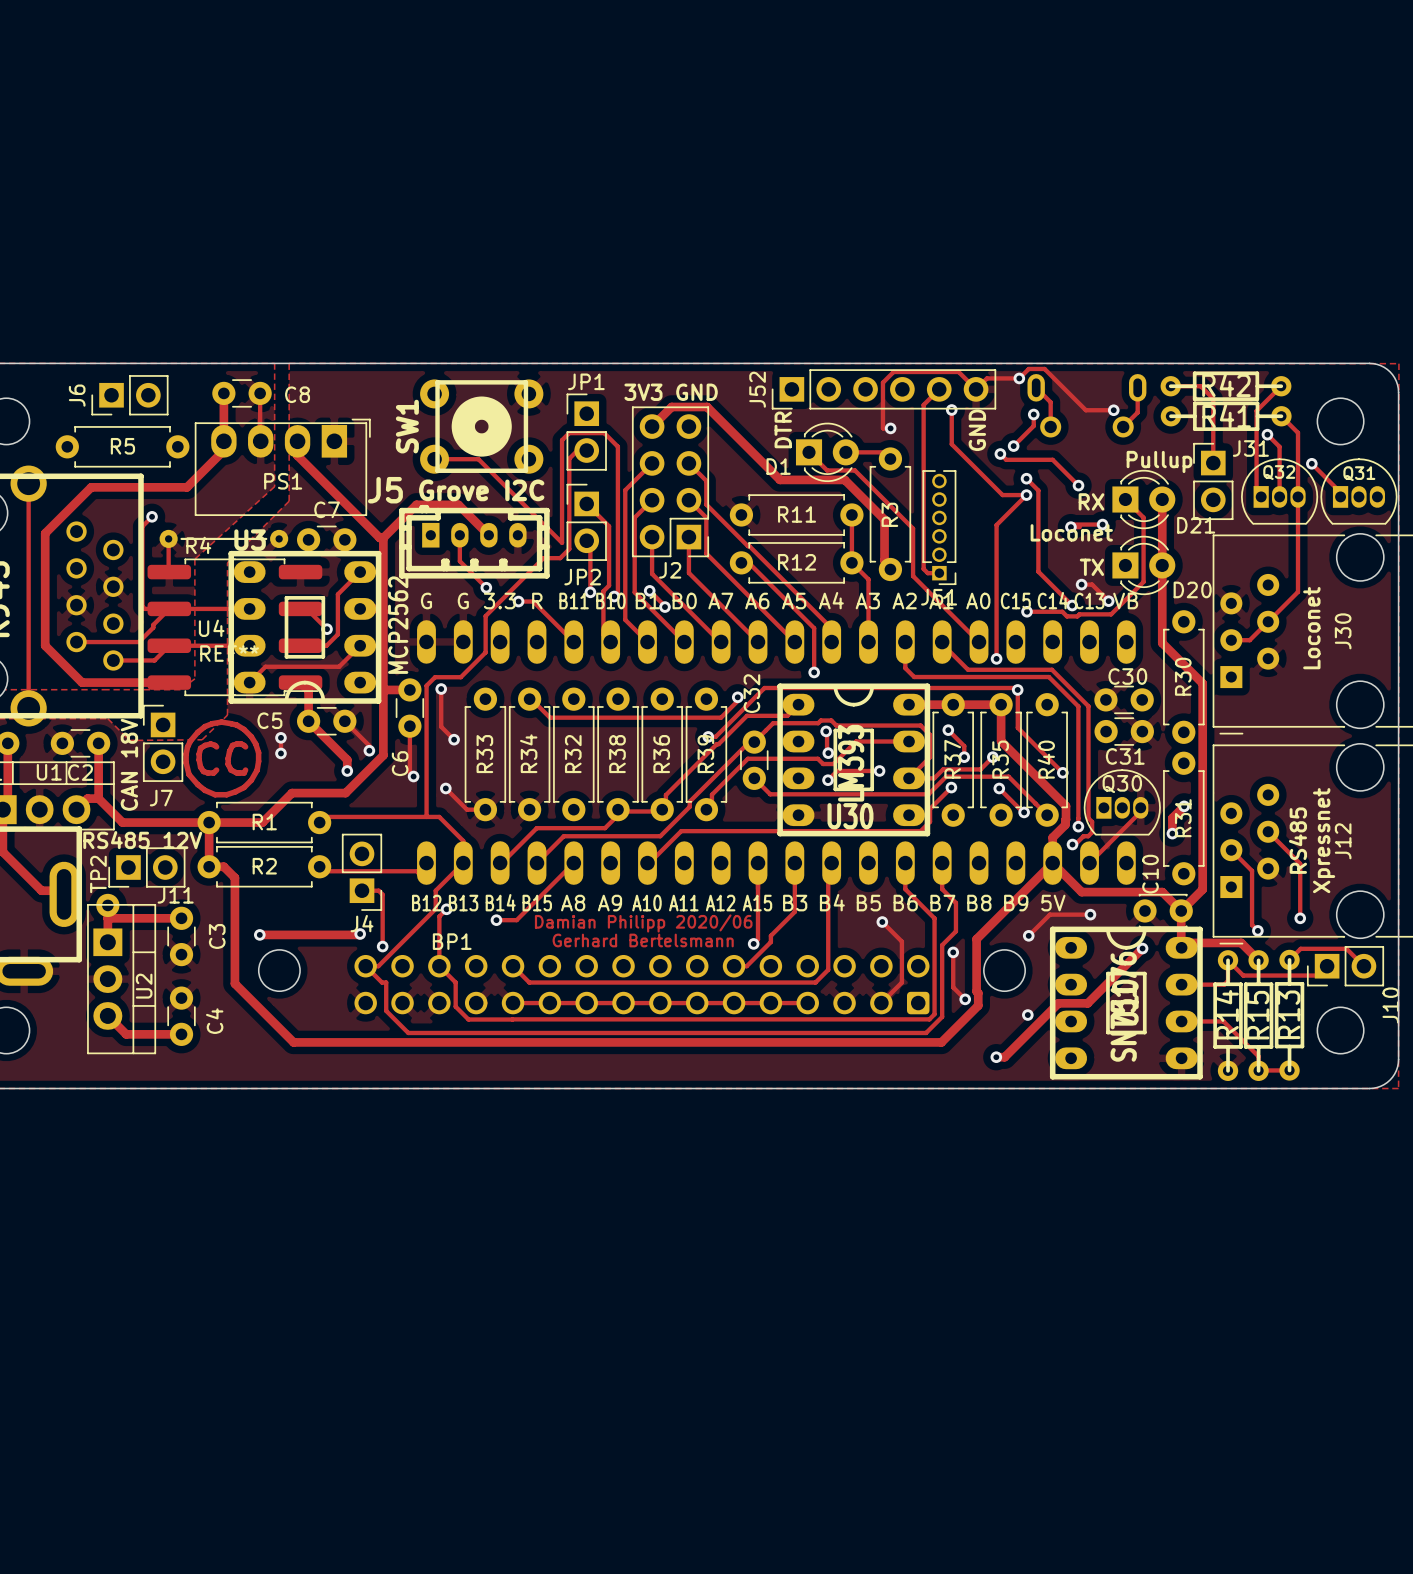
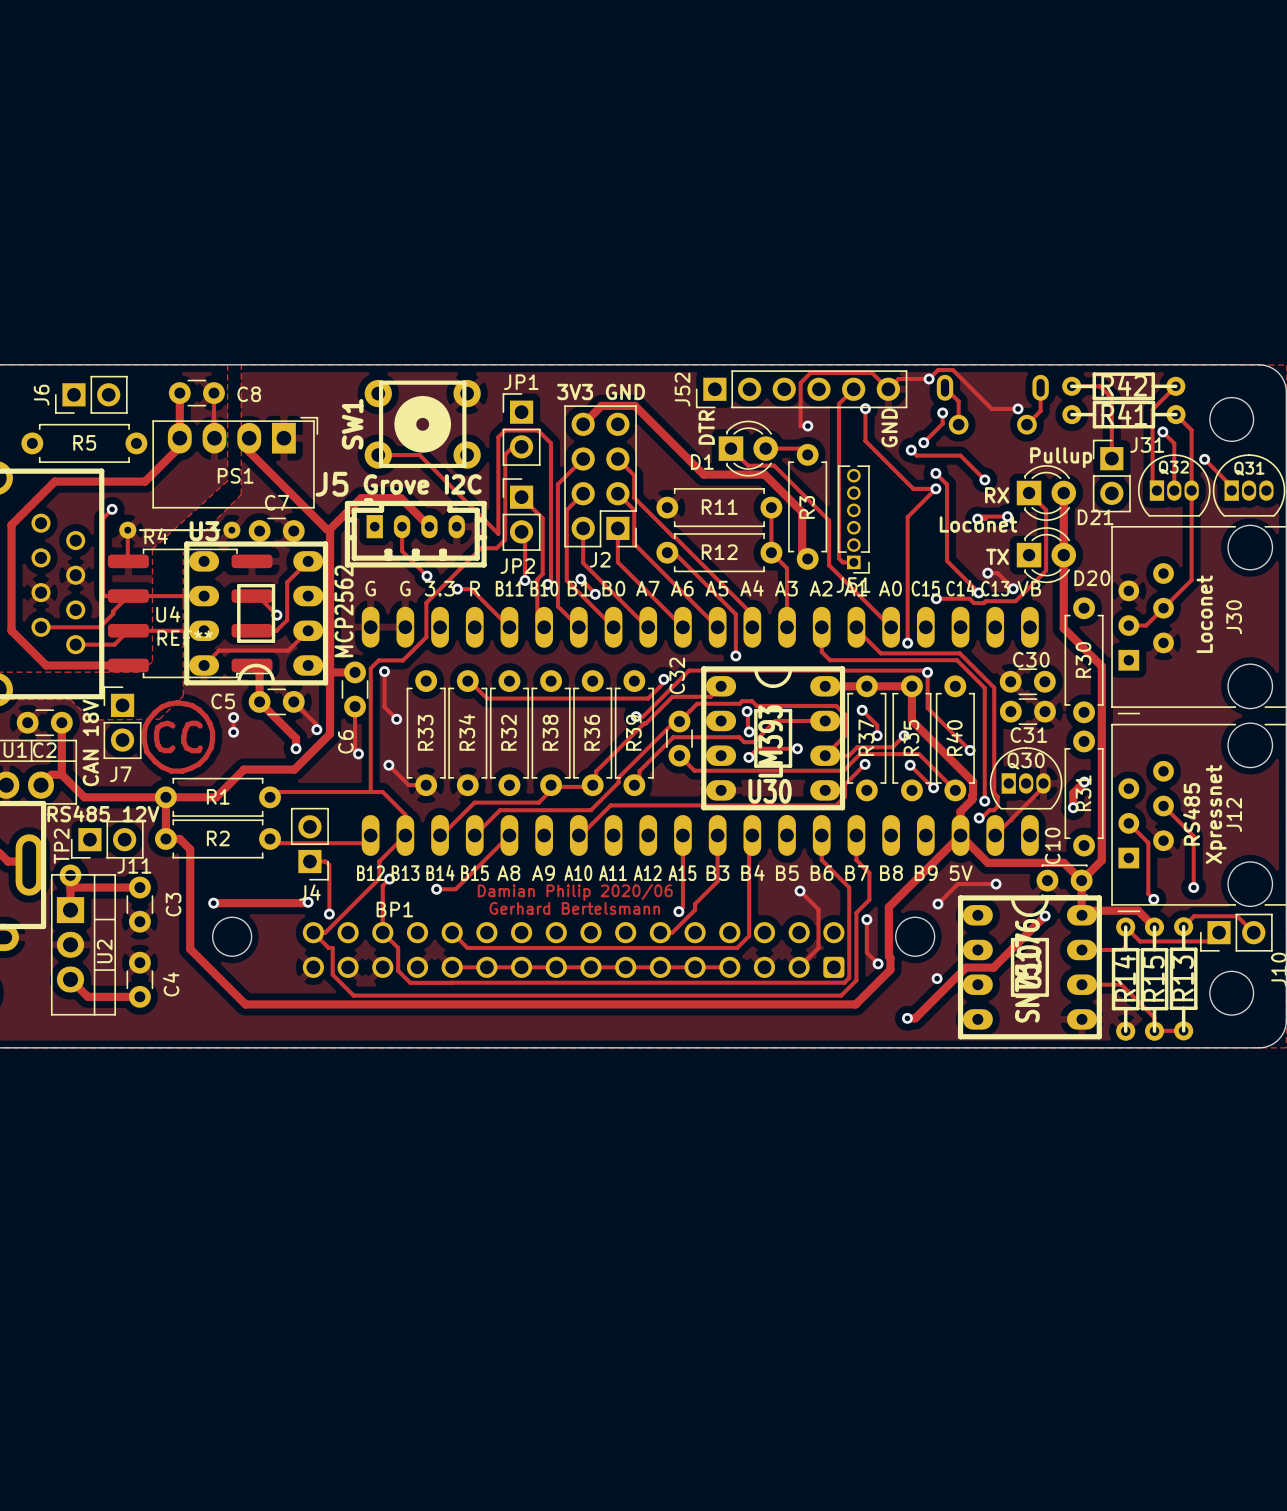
text: Damian Philipp 2020/06 (643, 923) -> Damian Philip 2020/06 (575, 892)

